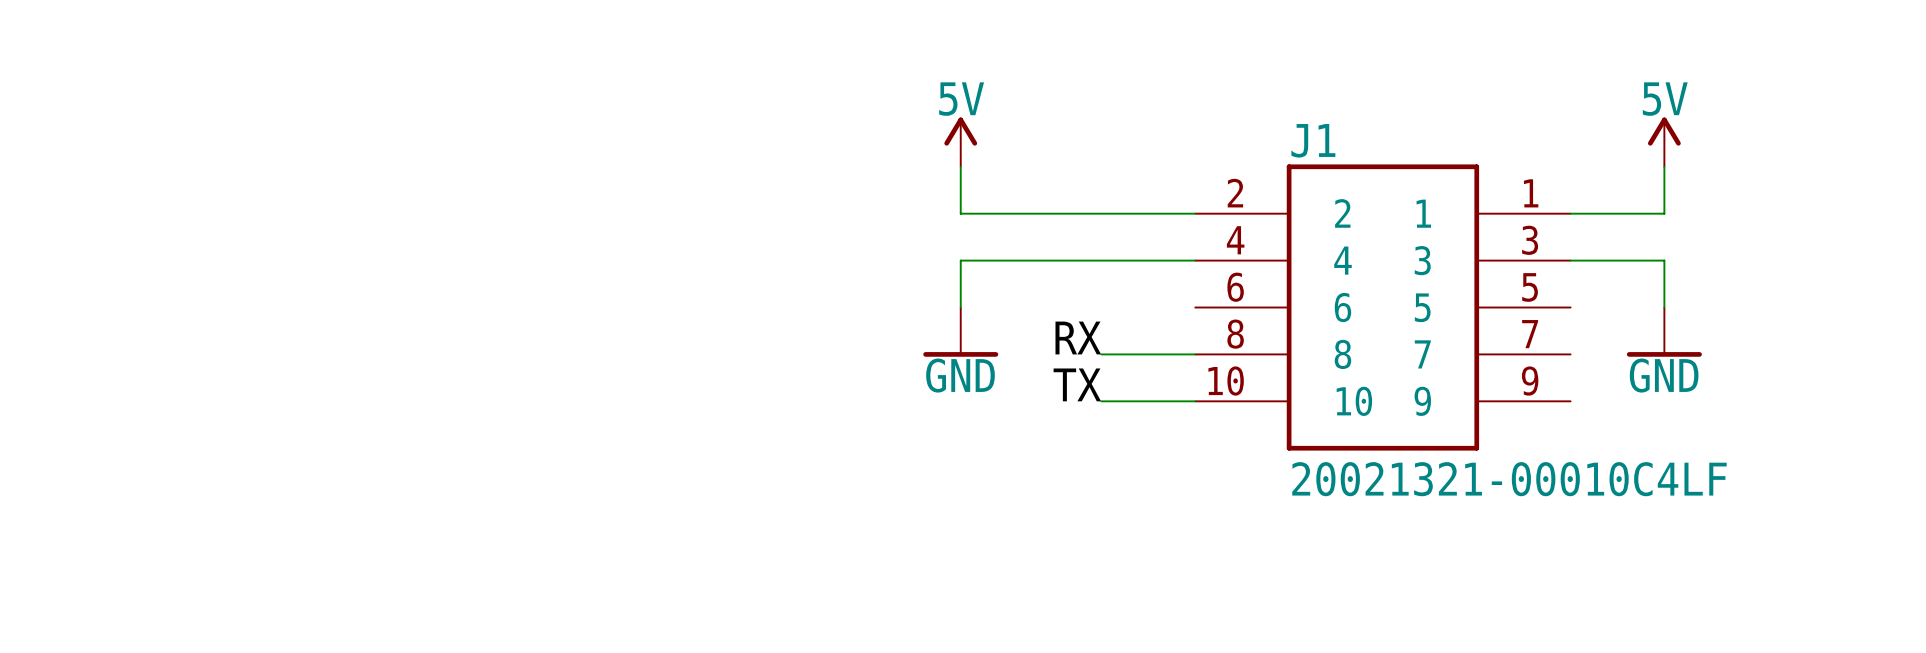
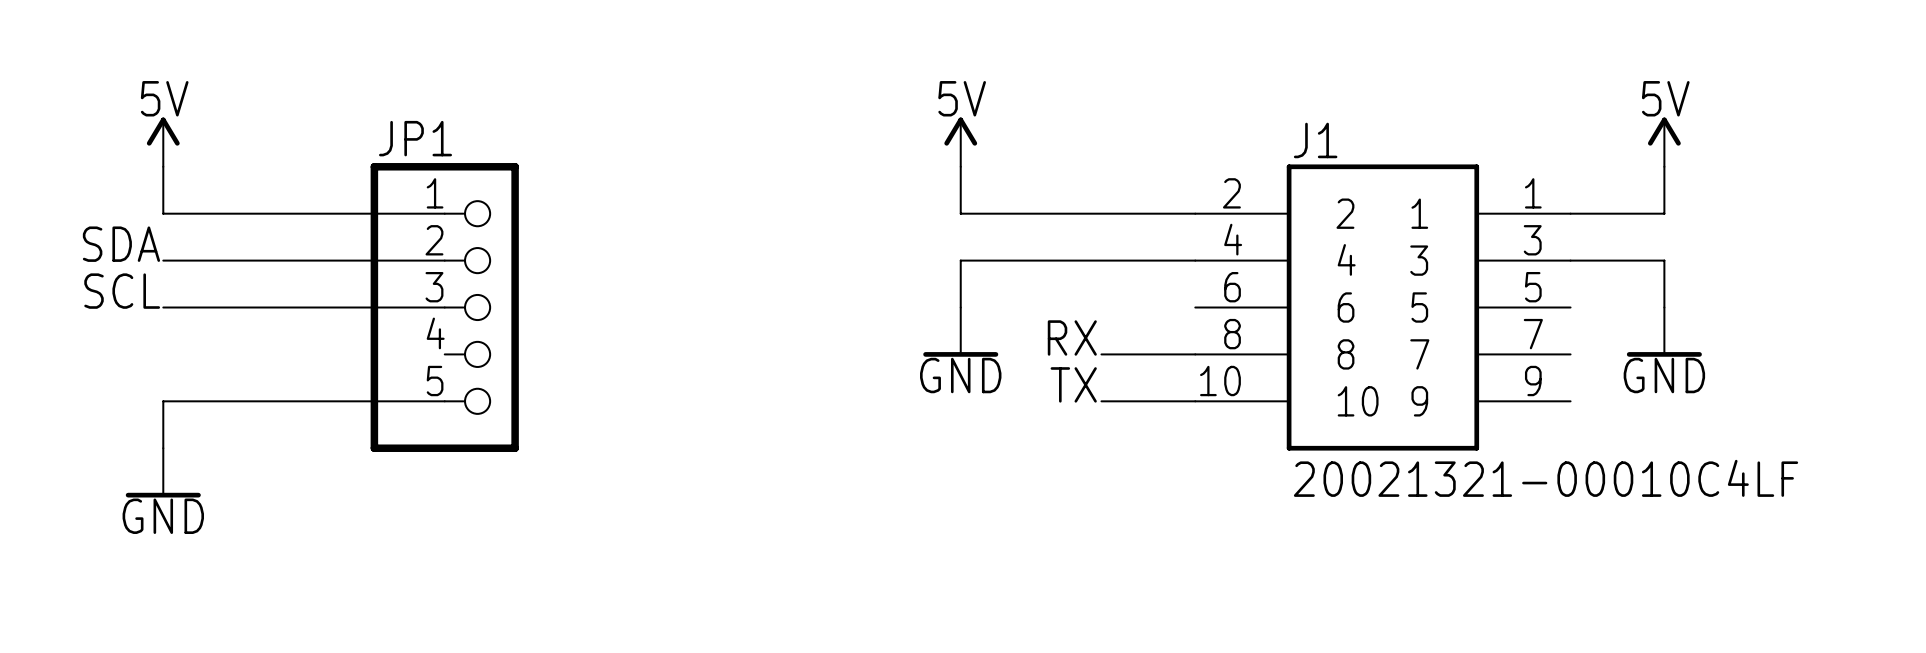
power symbol: none -> 5V (163, 142)
wire: none -> (163, 166) (163, 213) (444, 213)
label: none -> SDA (121, 244)
wire: none -> (163, 260) (444, 260)
label: none -> SCL (122, 291)
wire: none -> (163, 307) (444, 307)
JP1: none -> (444, 307)
wire: none -> (444, 401) (163, 401) (163, 448)
power symbol: none -> GND (163, 472)

